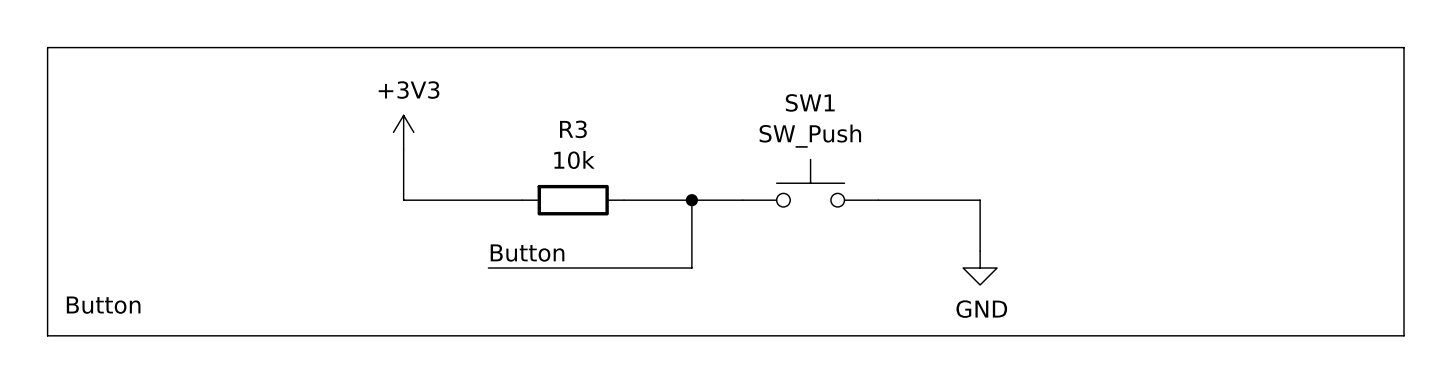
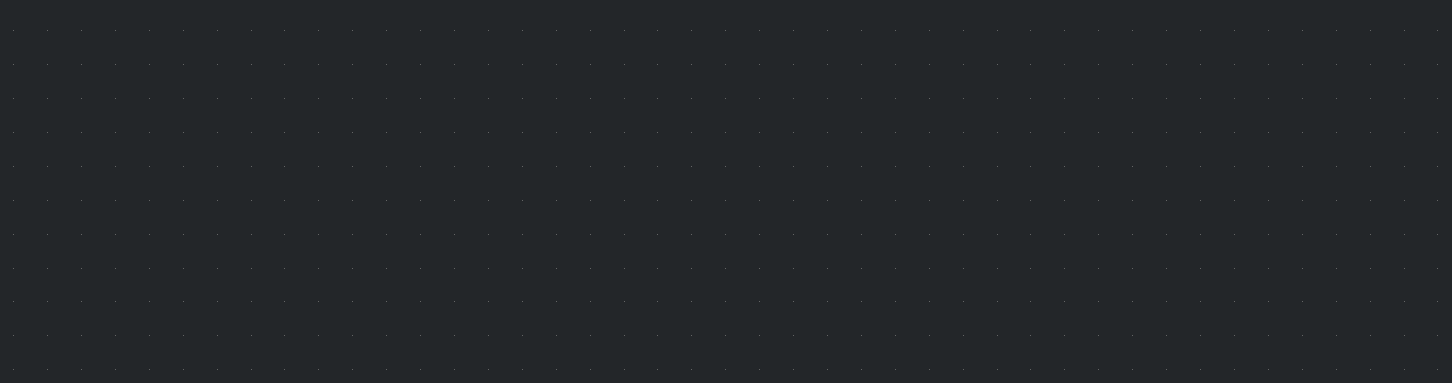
line: (47, 47) (1404, 47) (1404, 335) (47, 335) (47, 47) -> none
power symbol: +3V3 (403, 132) -> none
wire: (403, 149) (403, 200) (522, 200) -> none
SW1: SW_Push (810, 183) -> none
R3: 10k (573, 200) -> none
wire: (624, 200) (742, 200) -> none
wire: (691, 200) (691, 268) (488, 268) -> none
junction: (691, 200) -> none
wire: (878, 200) (980, 200) (980, 251) -> none
label: Button (527, 253) -> none
power symbol: GND (980, 268) -> none
text: Button (103, 305) -> none

